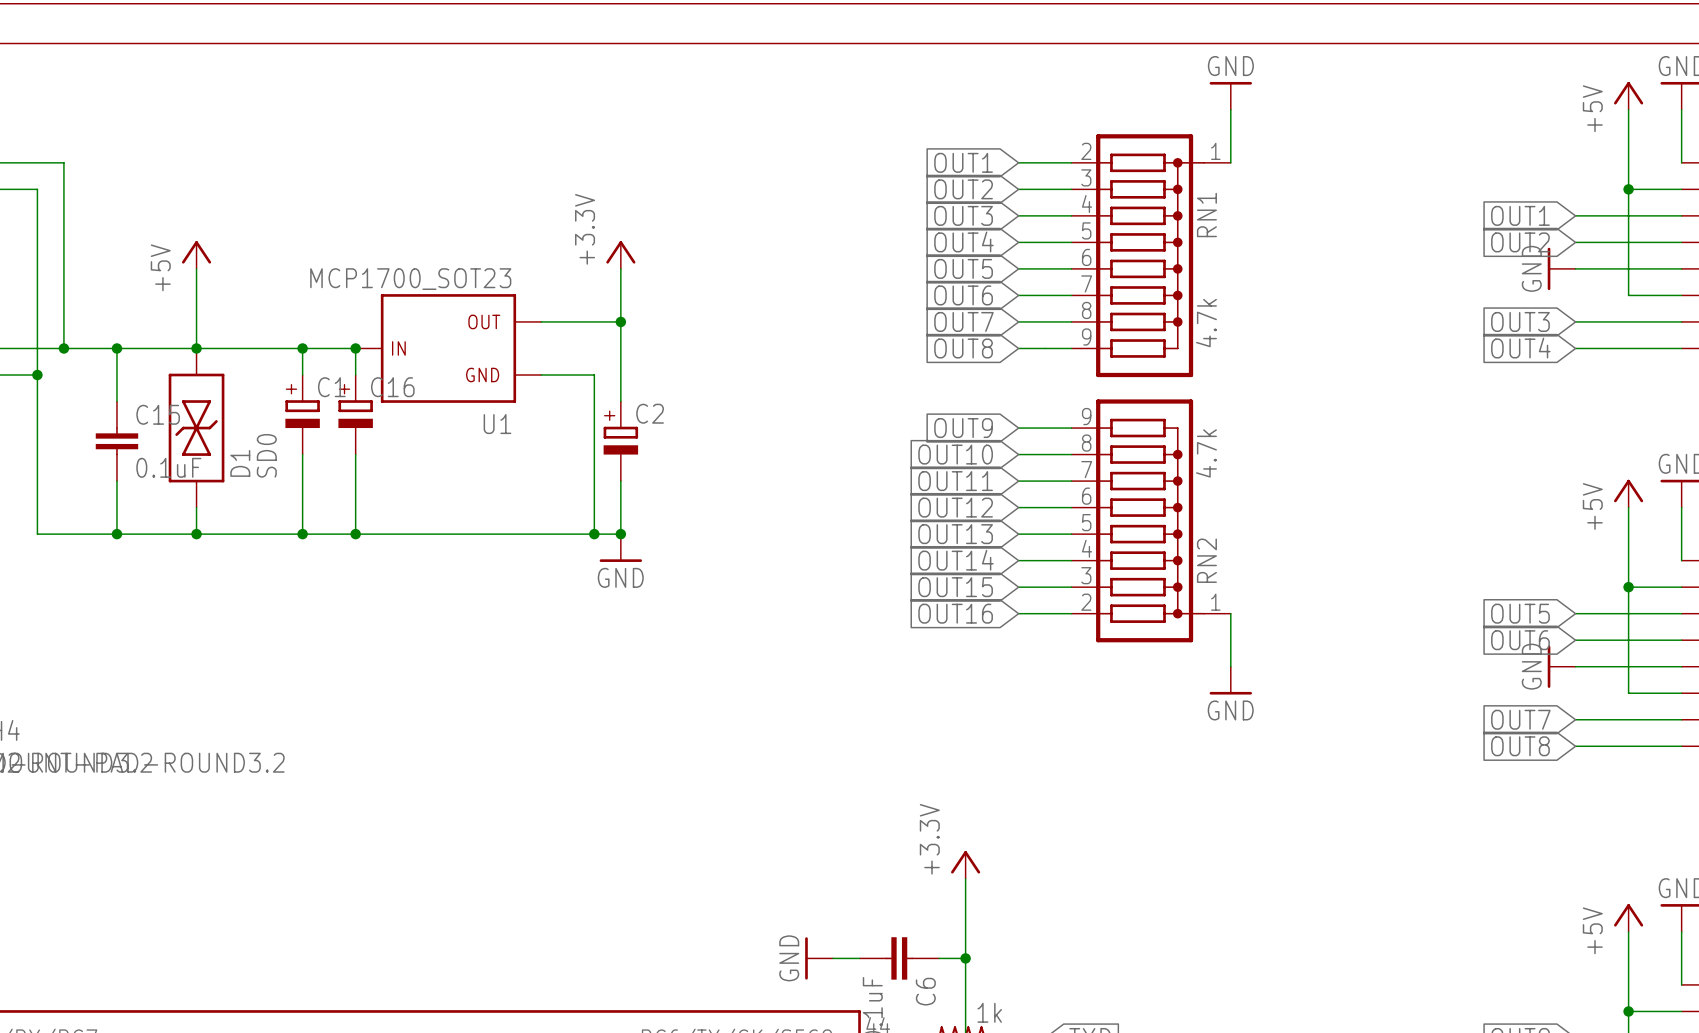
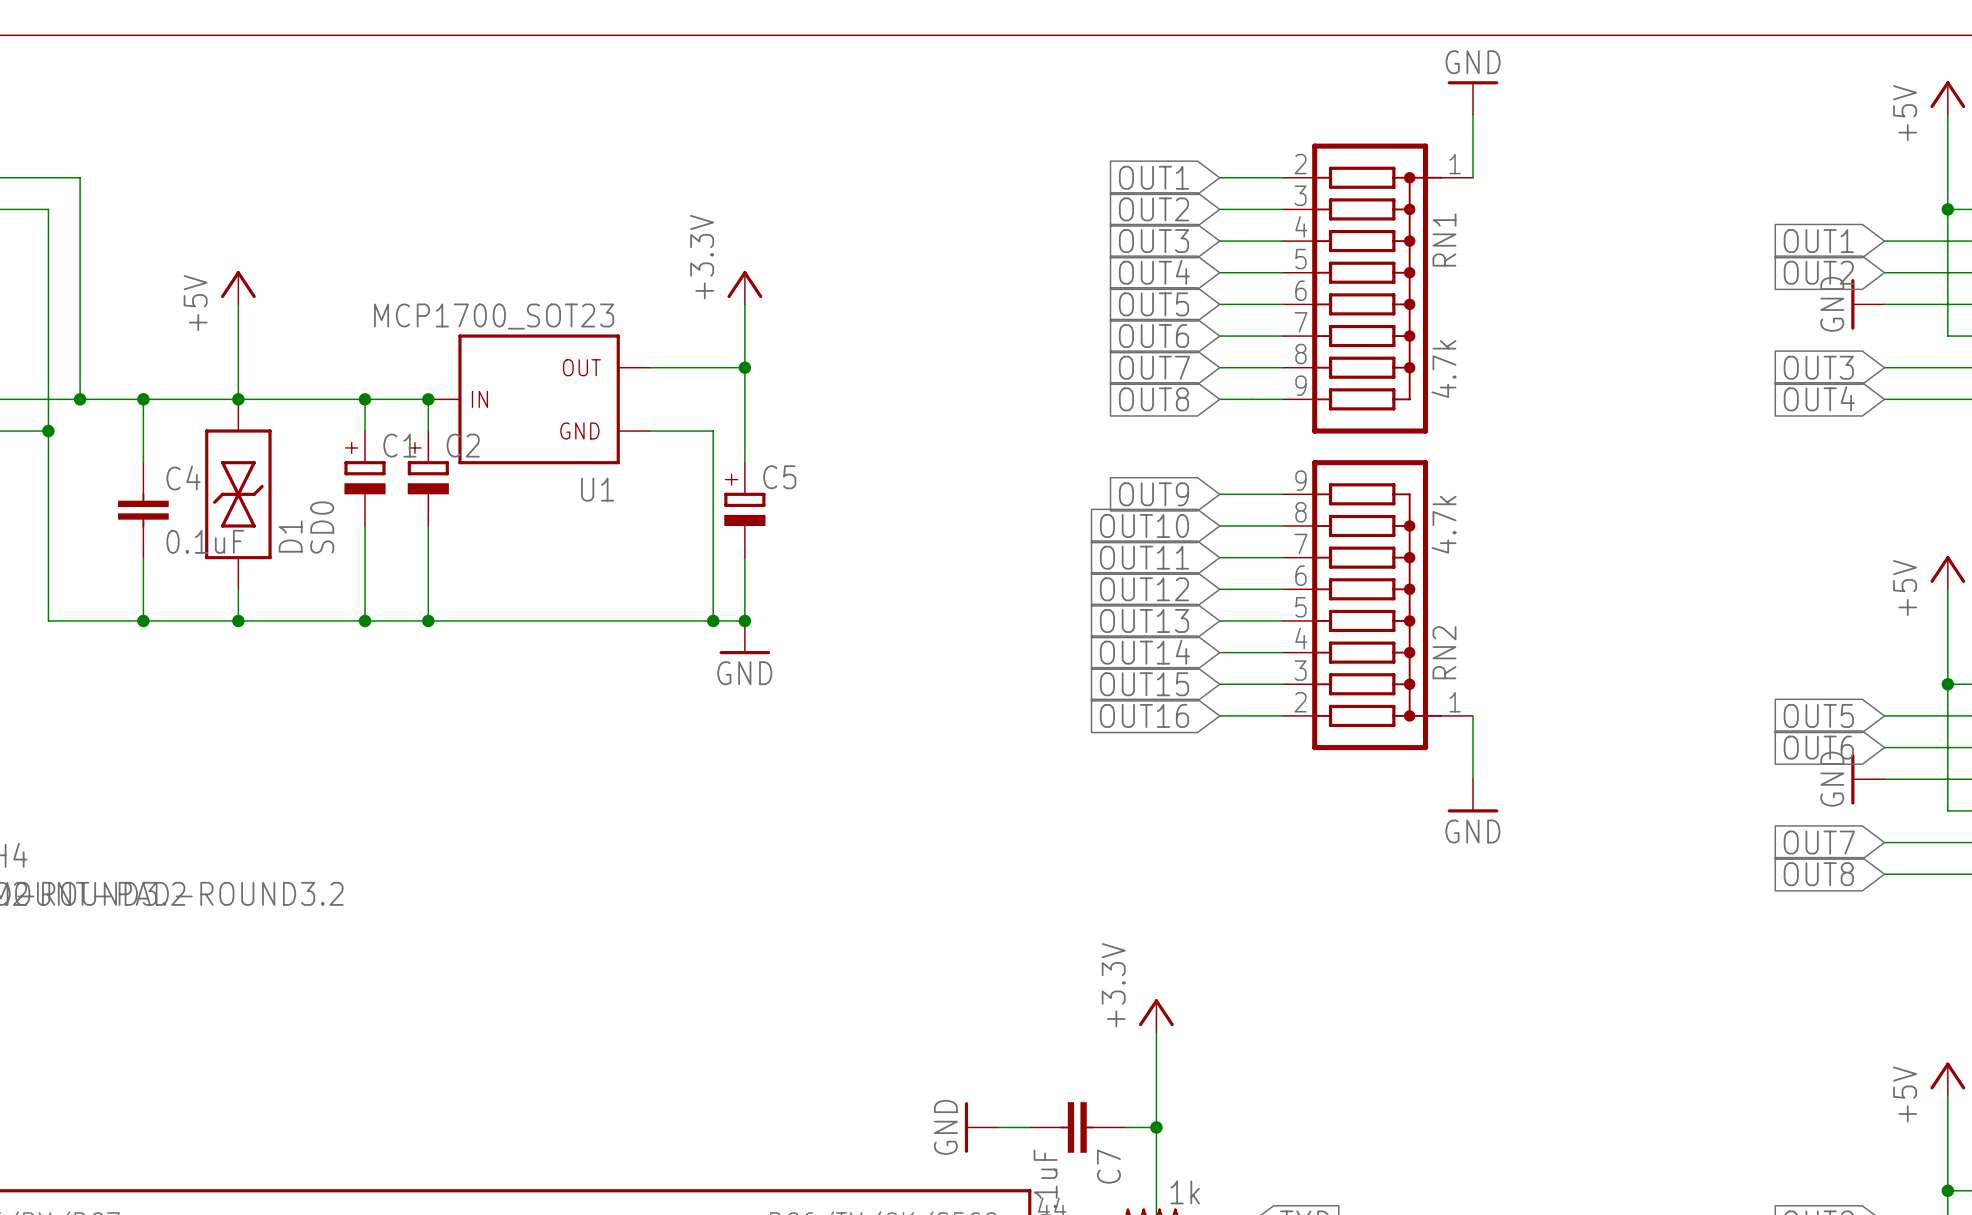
C16 name: C16 (392, 387) -> C2 (463, 445)
C2 name: C2 (650, 413) -> C5 (779, 477)
C15 name: C15 (158, 414) -> C4 (183, 477)
C6 name: C6 (925, 991) -> C7 (1108, 1166)

